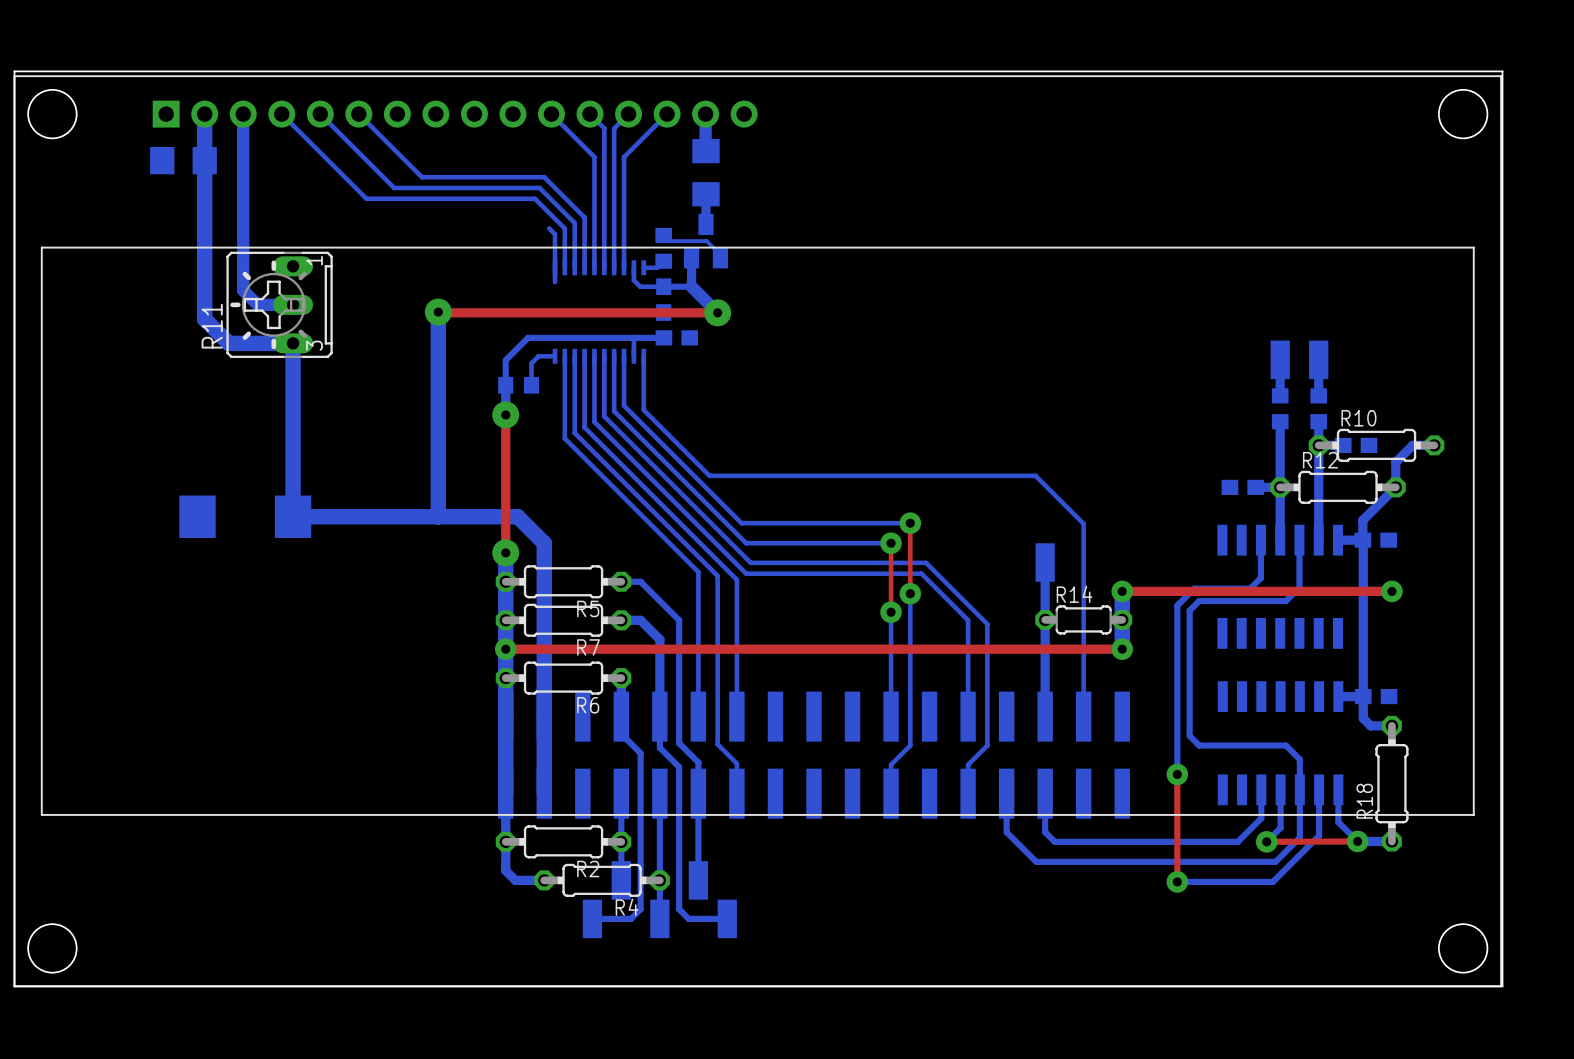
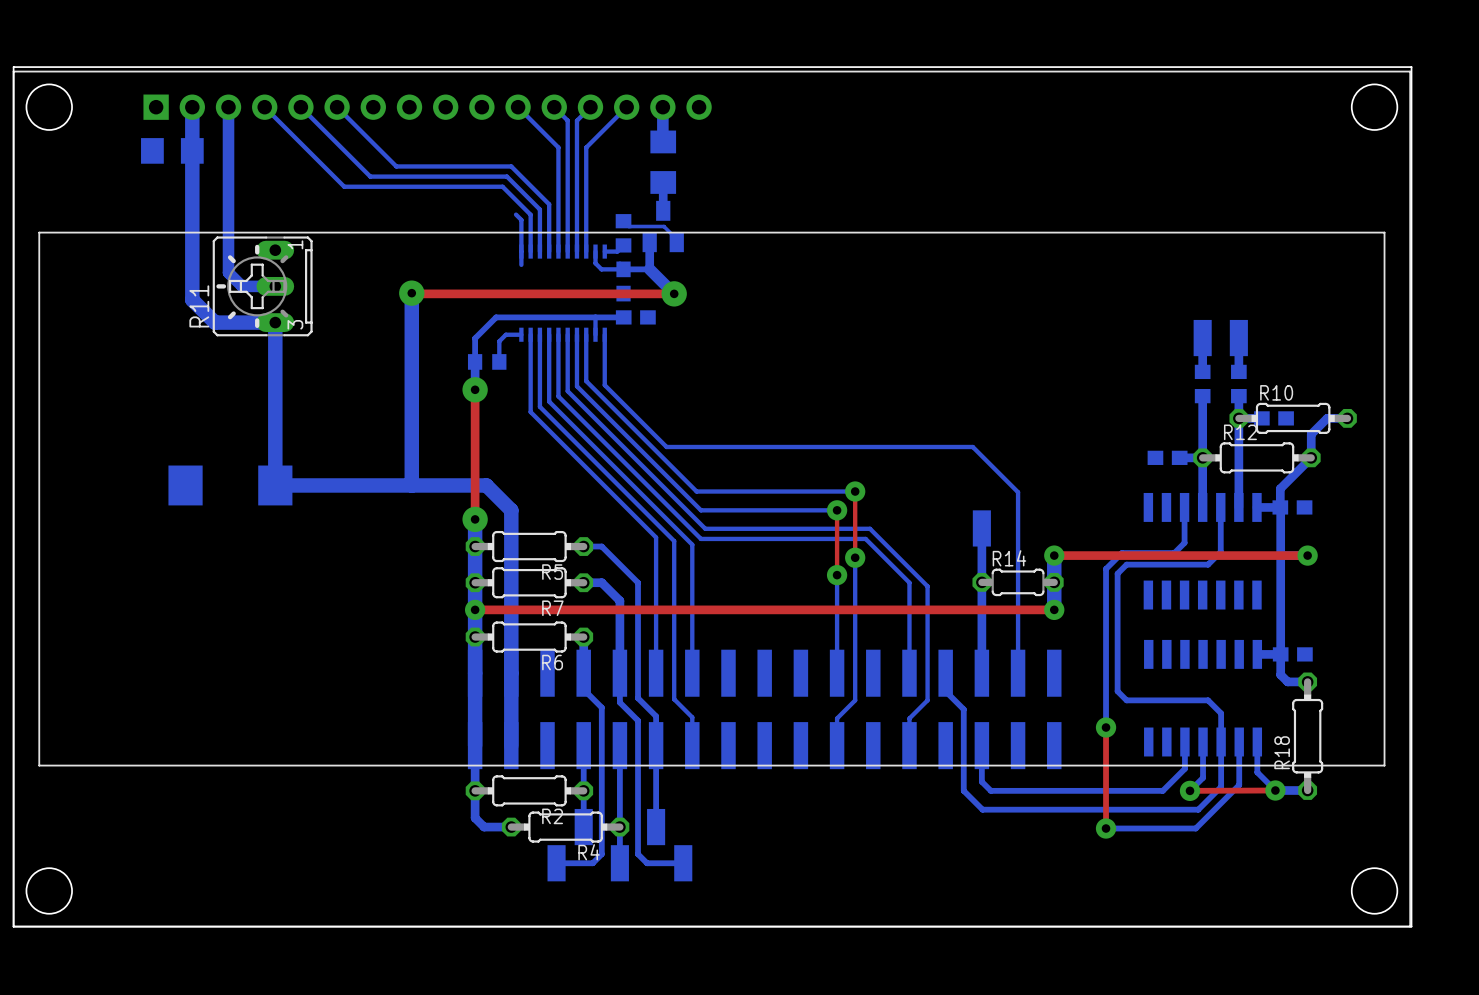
bottom track: (1006, 793) (1006, 832) (1036, 861) (1045, 861) -> (945, 673) (945, 691) (963, 709) (963, 790) (982, 809)

